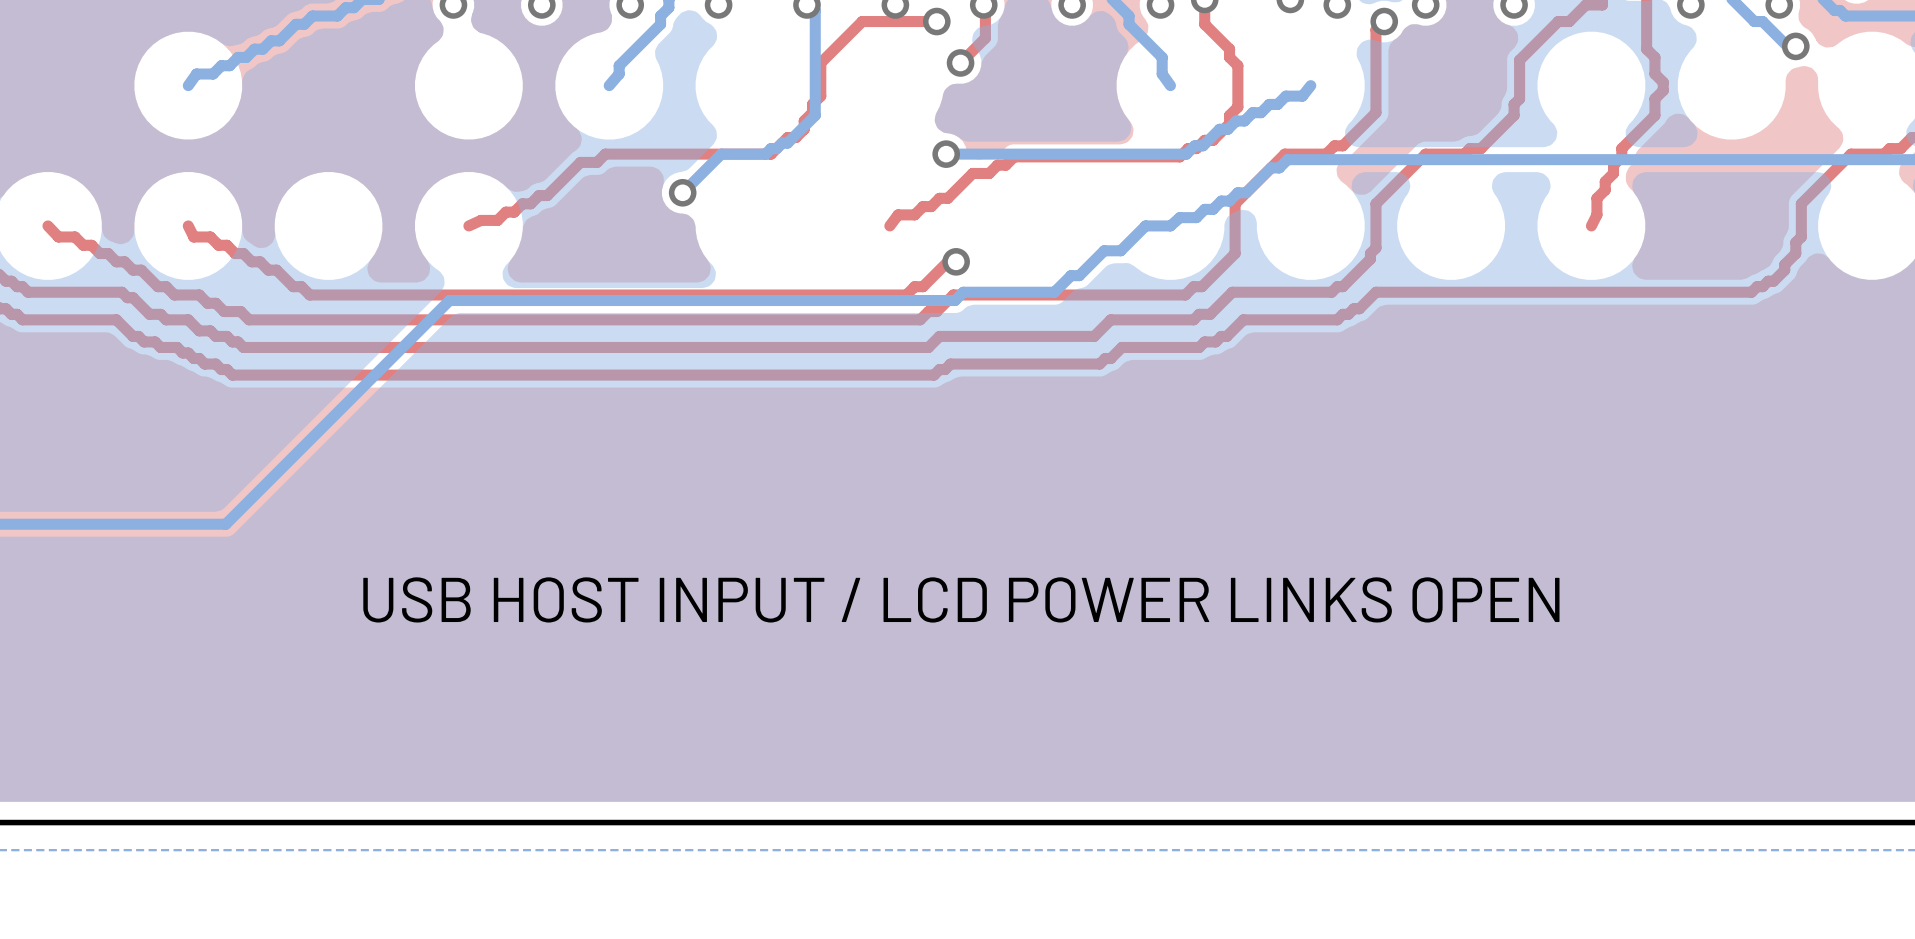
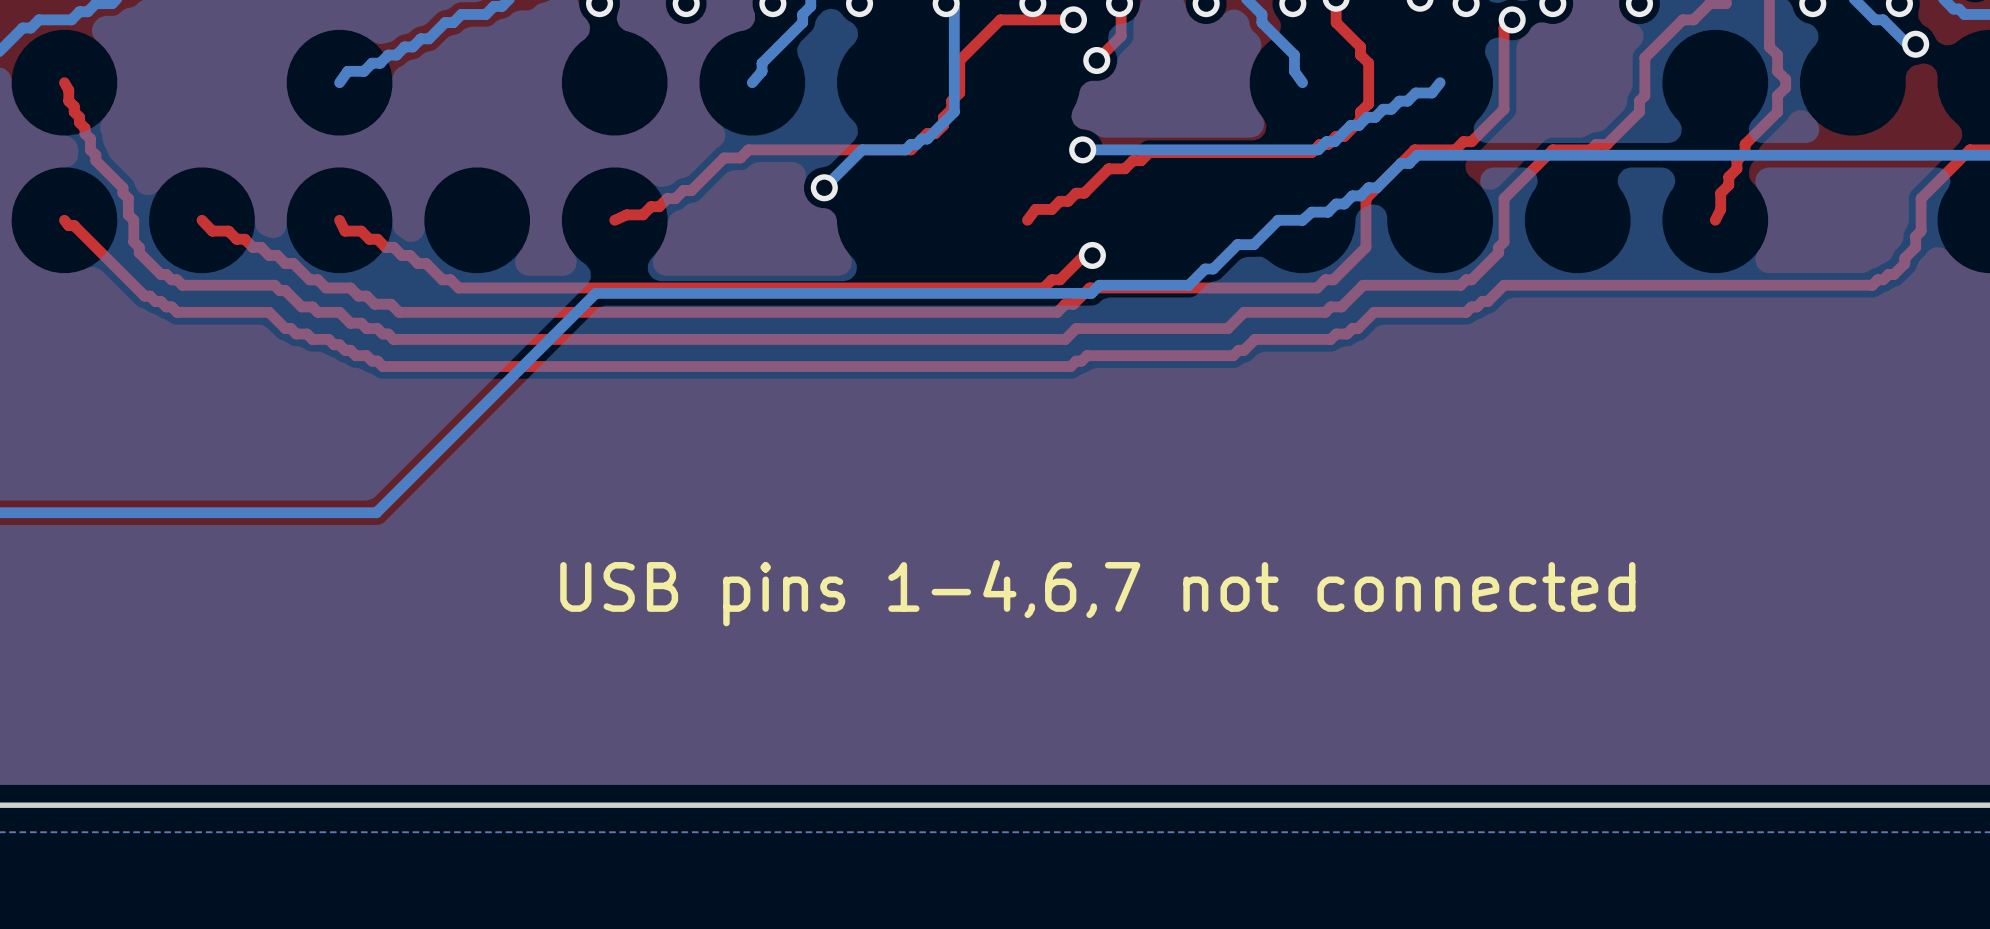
text: USB HOST INPUT / LCD POWER LINKS OPEN (961, 599) -> USB pins 1-4,6,7 not connected (1097, 593)

